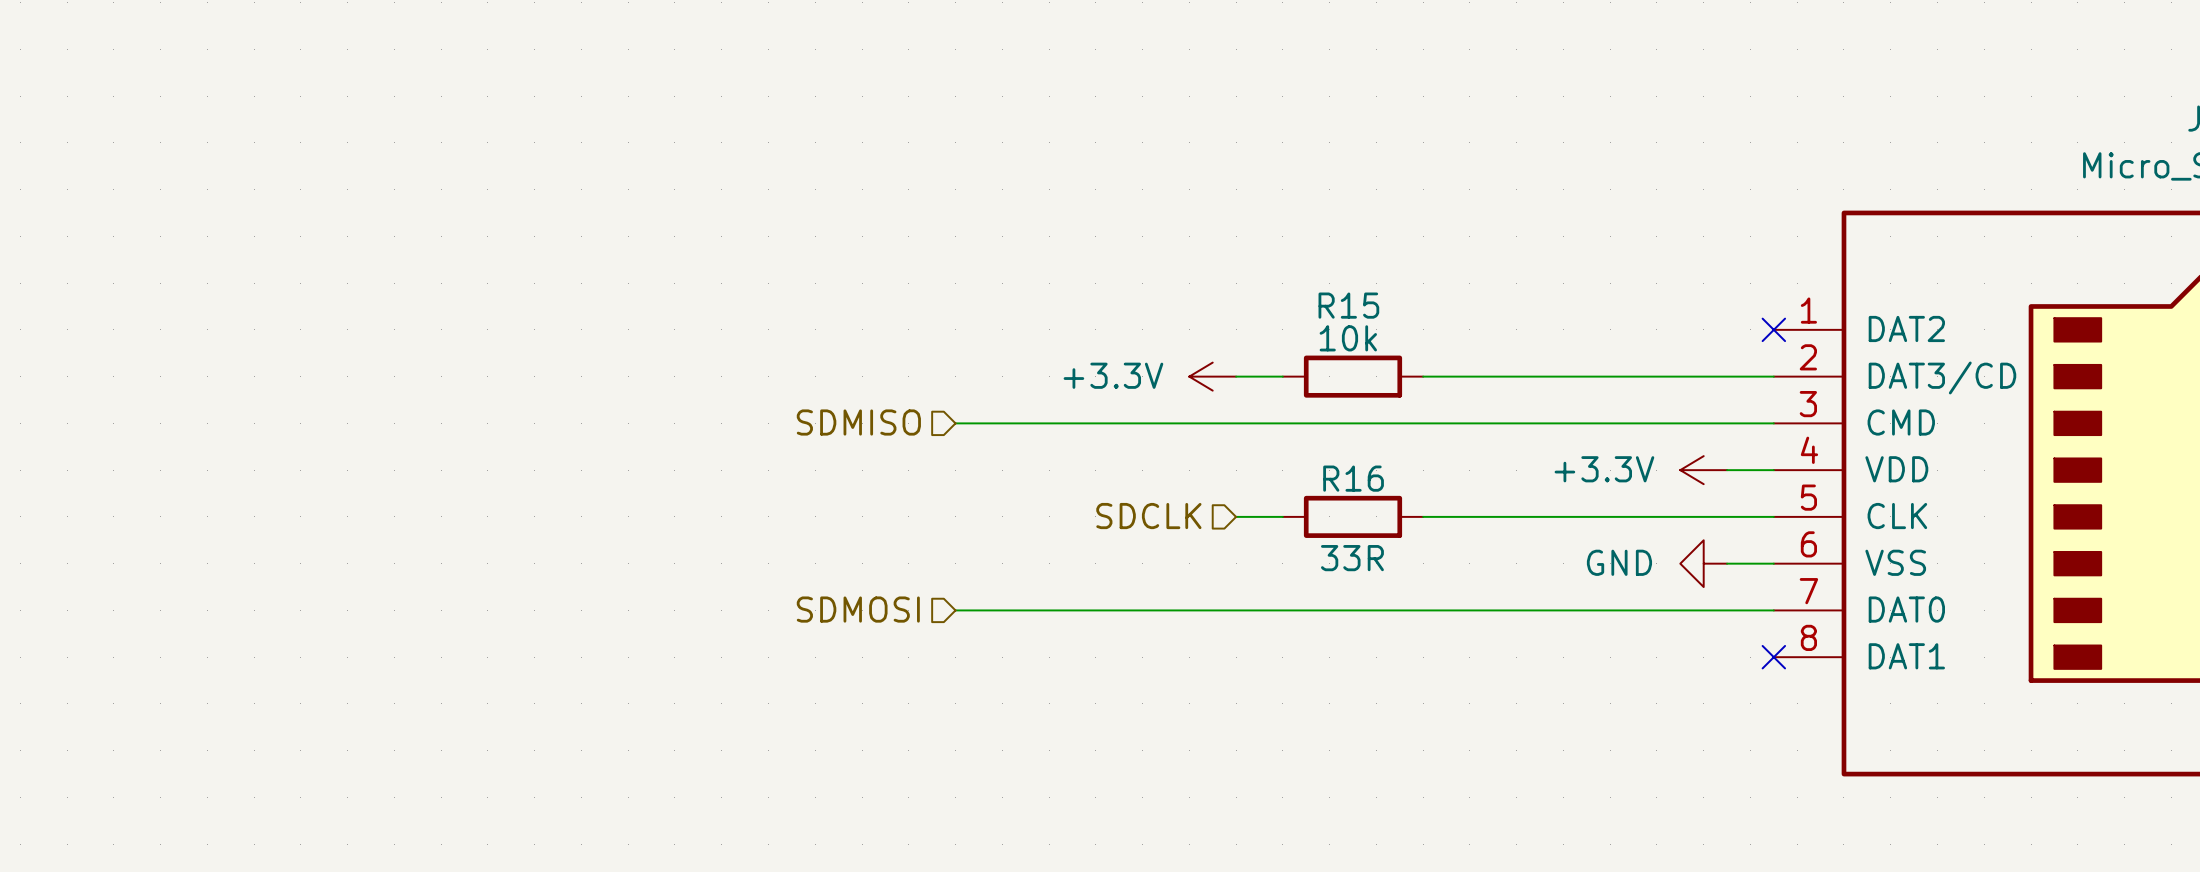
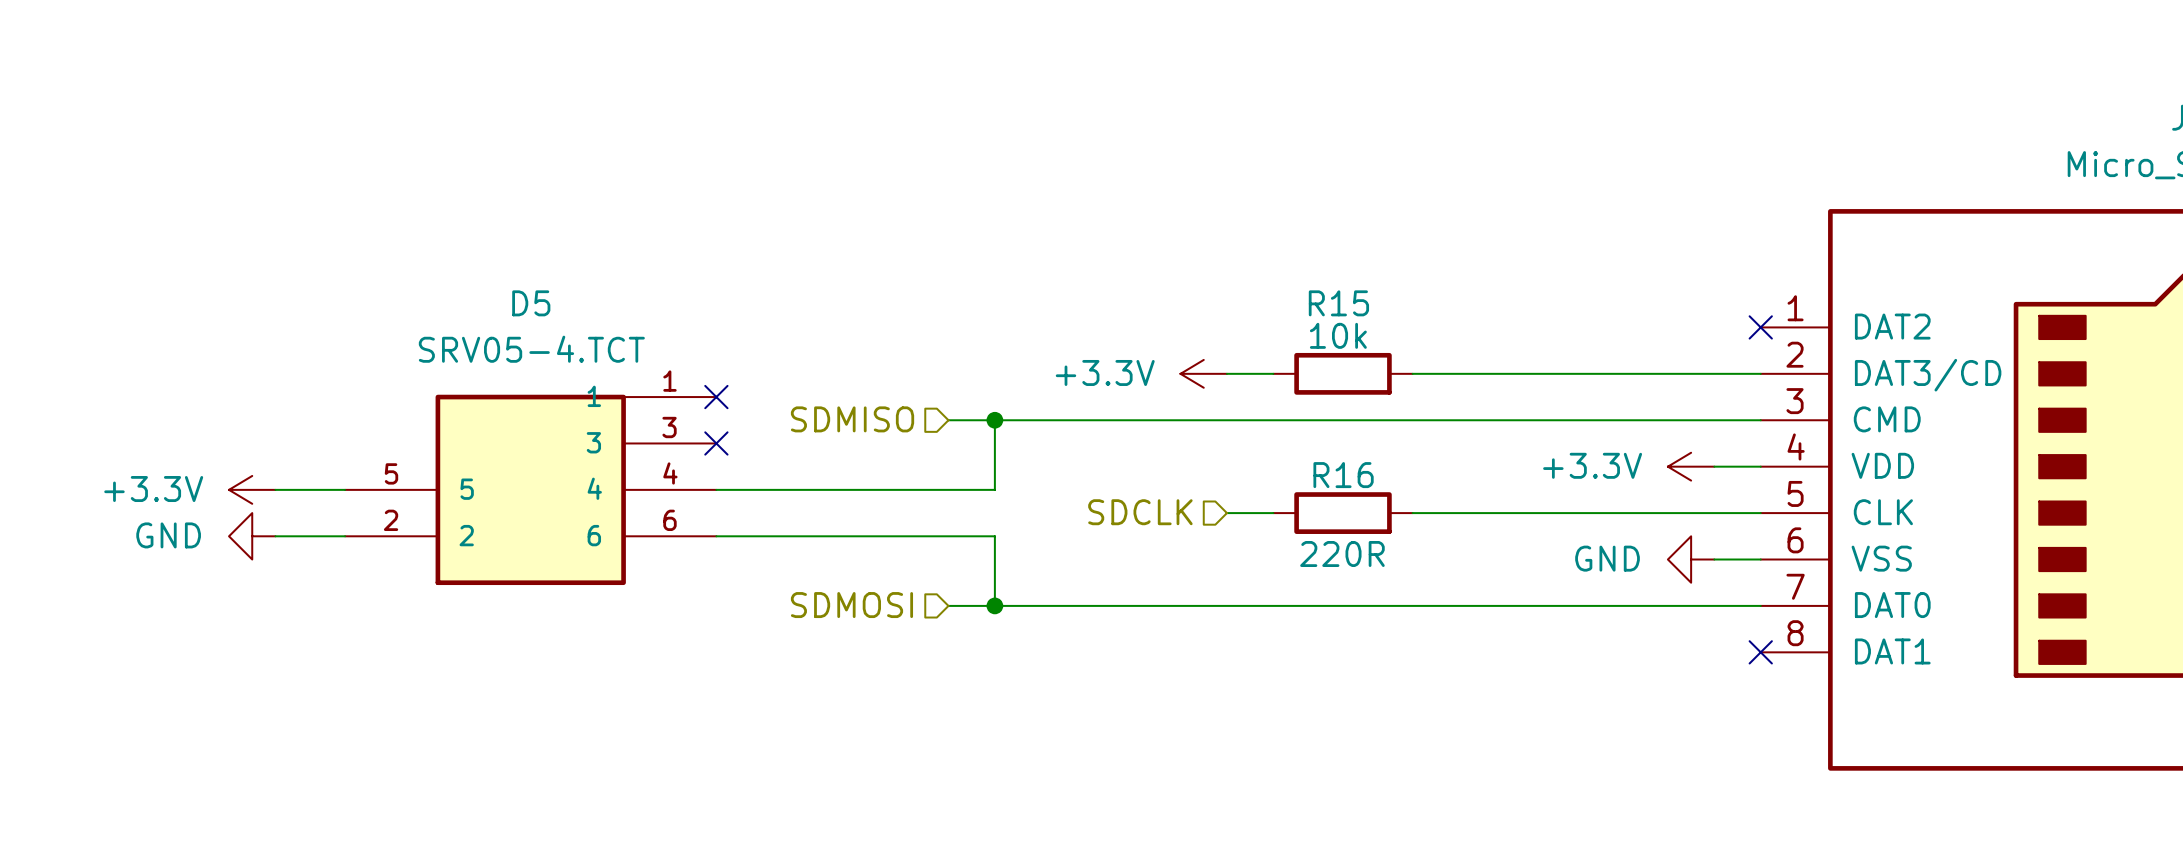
no-connect mark: none -> (716, 397)
wire: none -> (994, 420) (994, 489) (716, 489)
junction: none -> (994, 420)
no-connect mark: none -> (716, 443)
power symbol: none -> +3.3V (252, 489)
wire: none -> (275, 489) (345, 489)
D5: none -> SRV05-4.TCT (530, 489)
power symbol: none -> GND (252, 536)
wire: none -> (275, 536) (345, 536)
wire: none -> (716, 536) (994, 536) (994, 605)
R16 value: 33R (1352, 558) -> 220R (1342, 553)
junction: none -> (994, 605)

